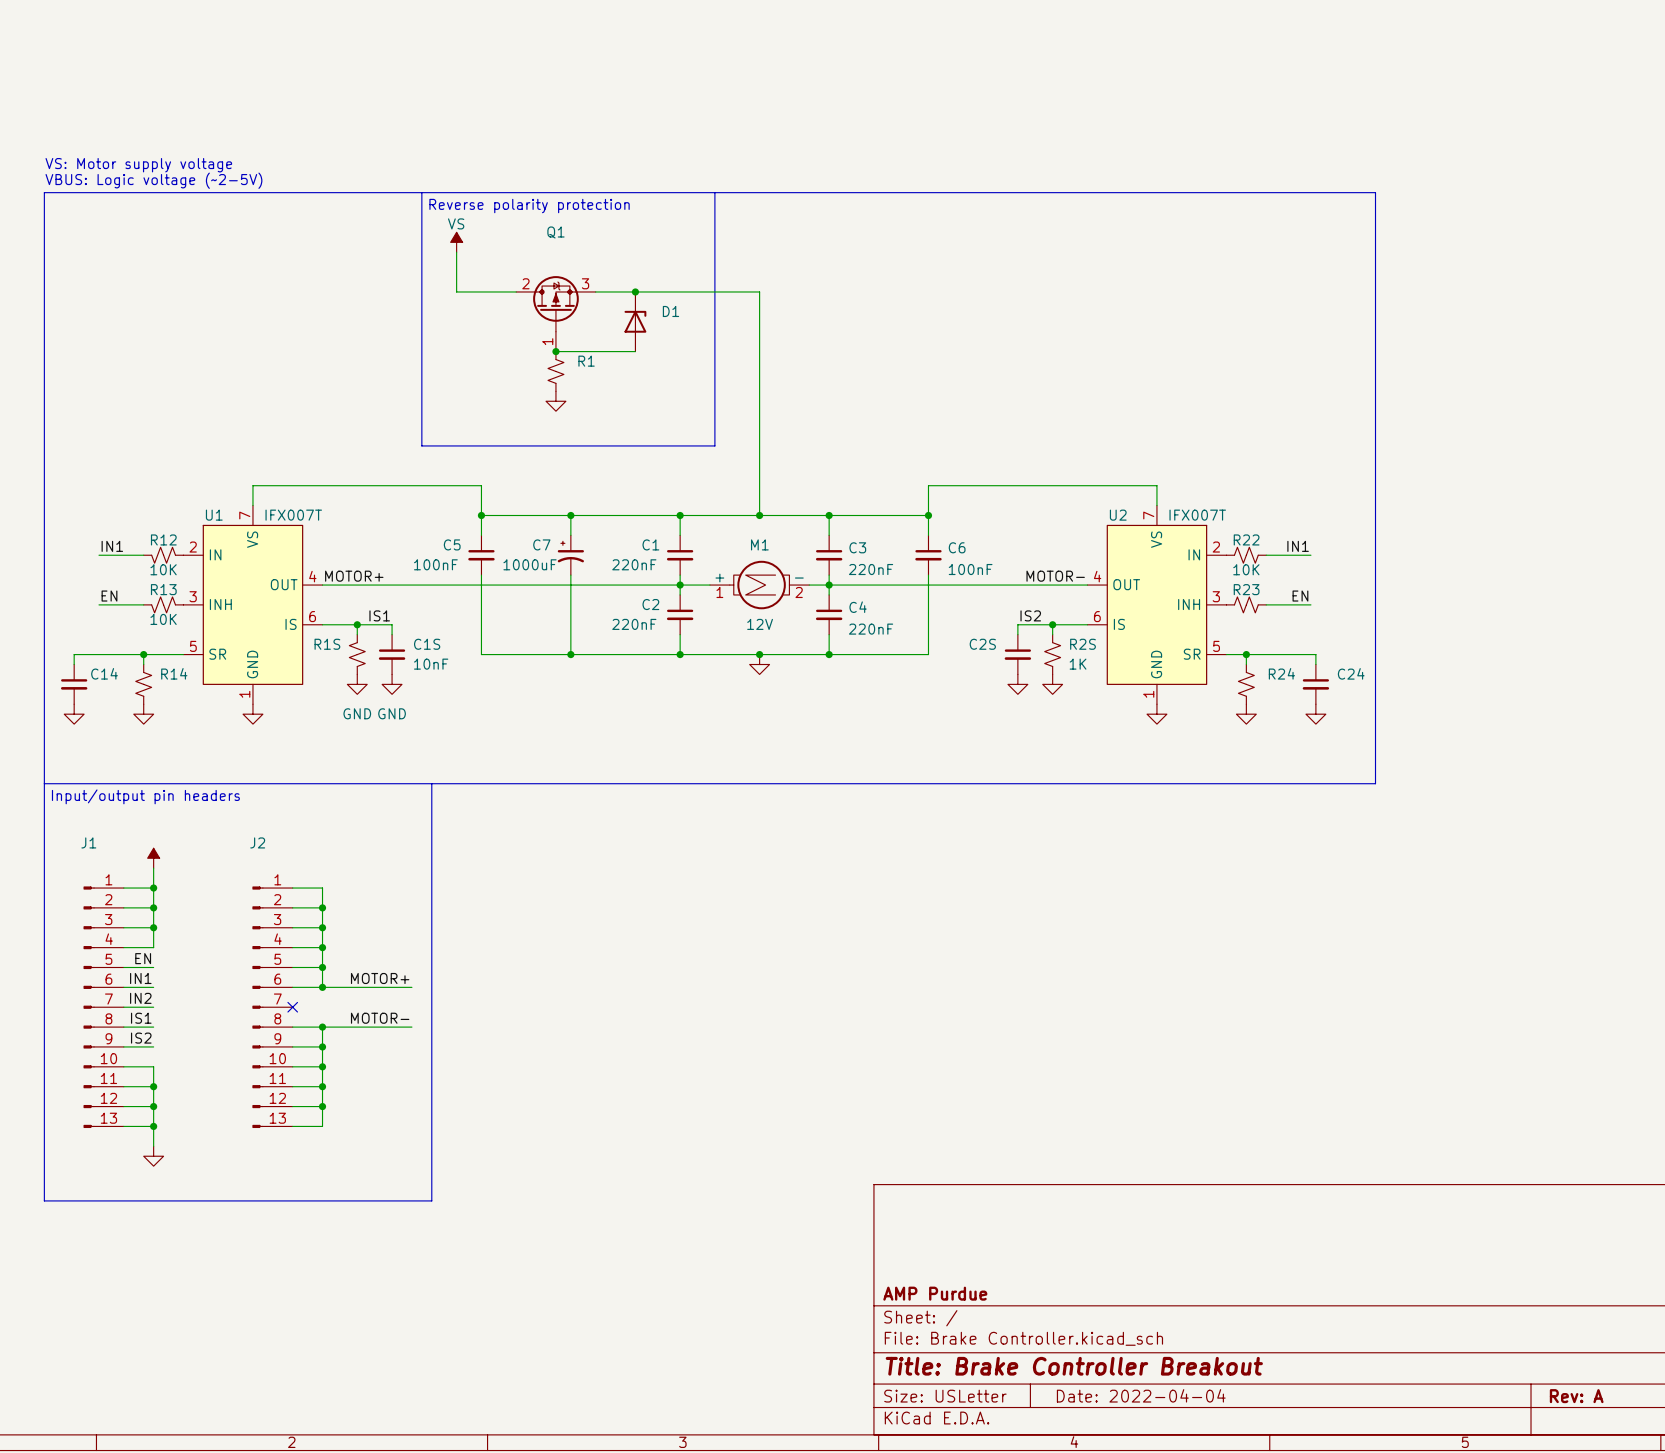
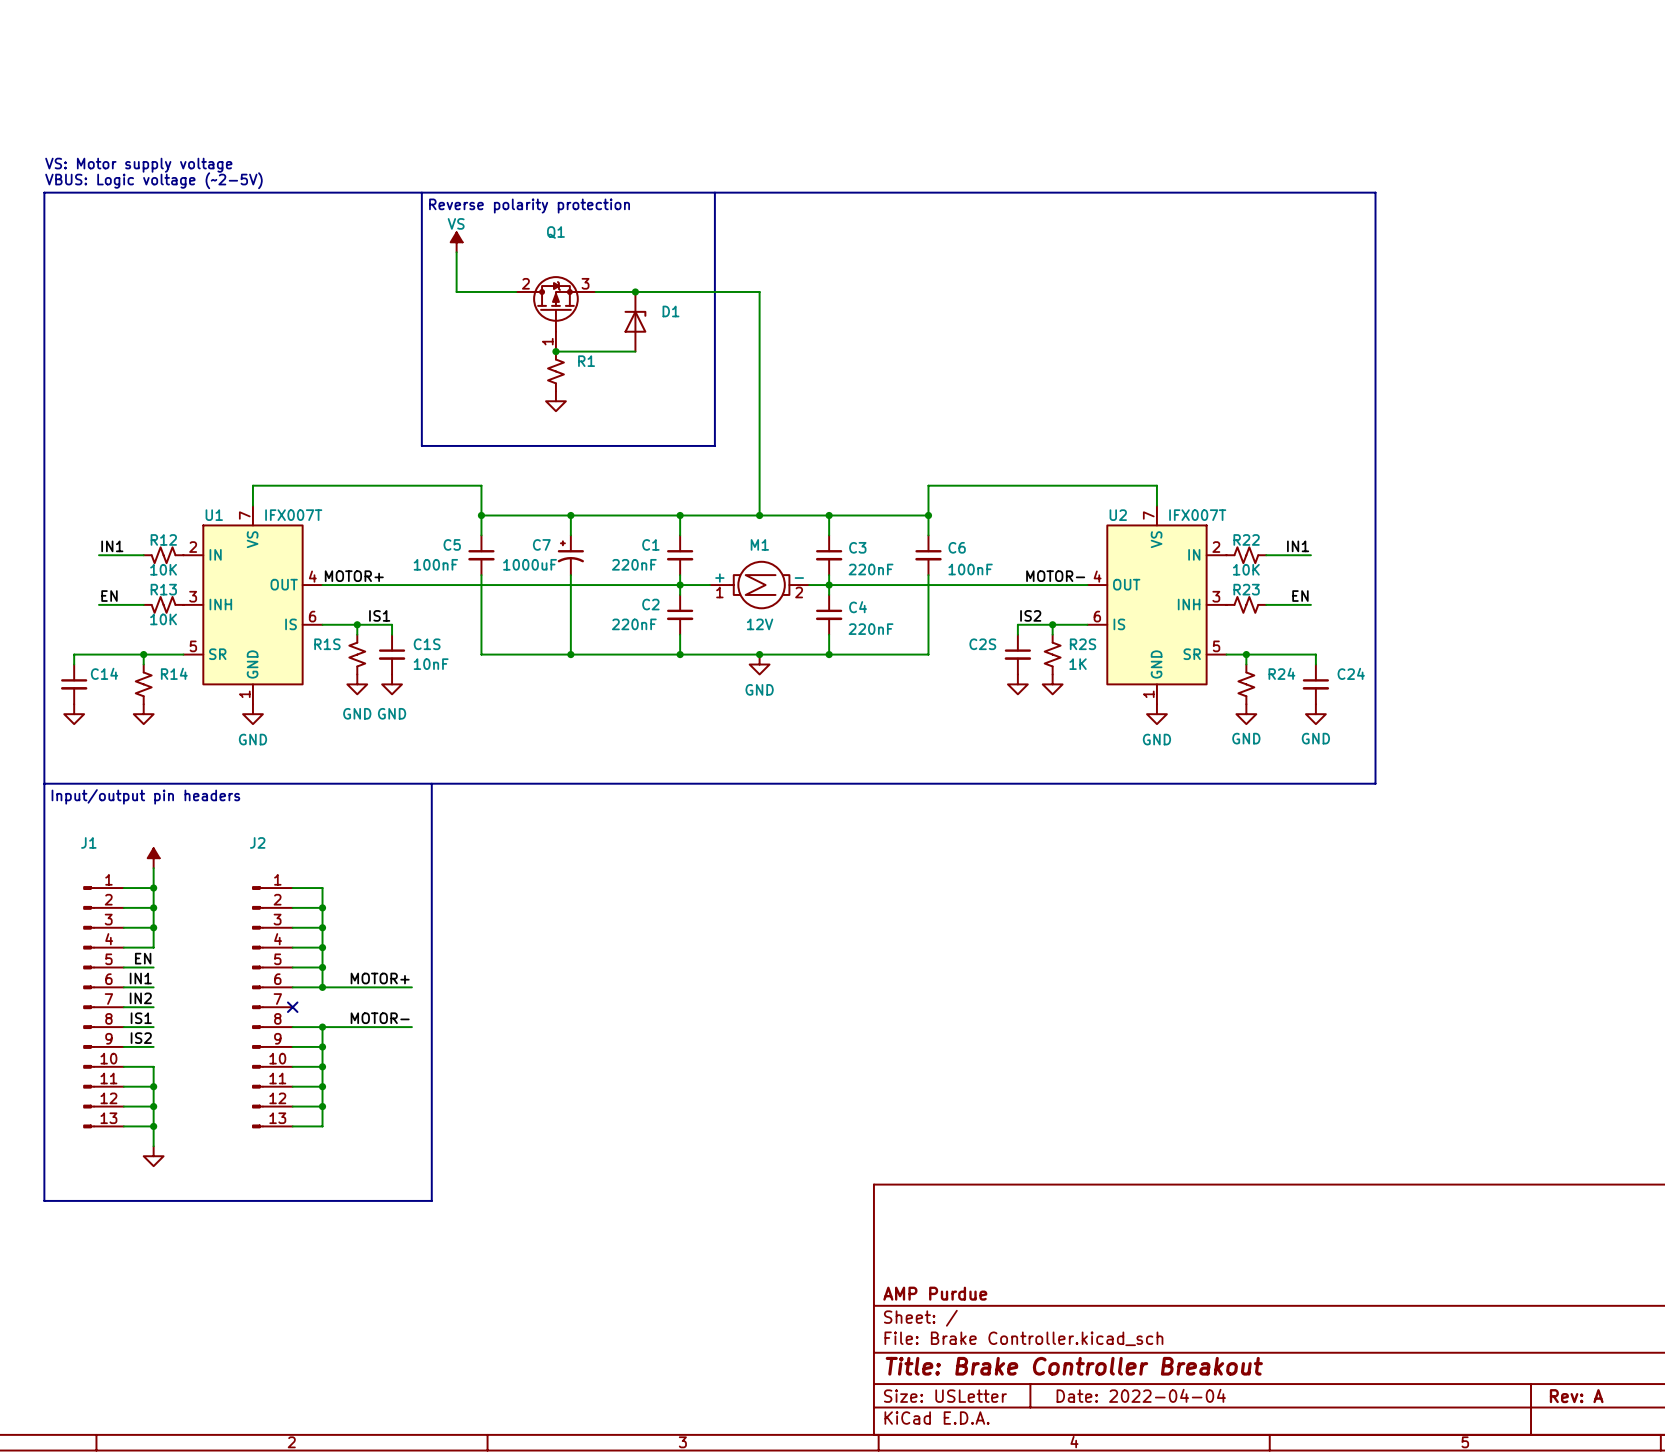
power symbol text: none -> GND (759, 689)
power symbol text: none -> GND (1246, 738)
power symbol text: none -> GND (1315, 738)
power symbol text: none -> GND (252, 739)
power symbol text: none -> GND (1156, 739)

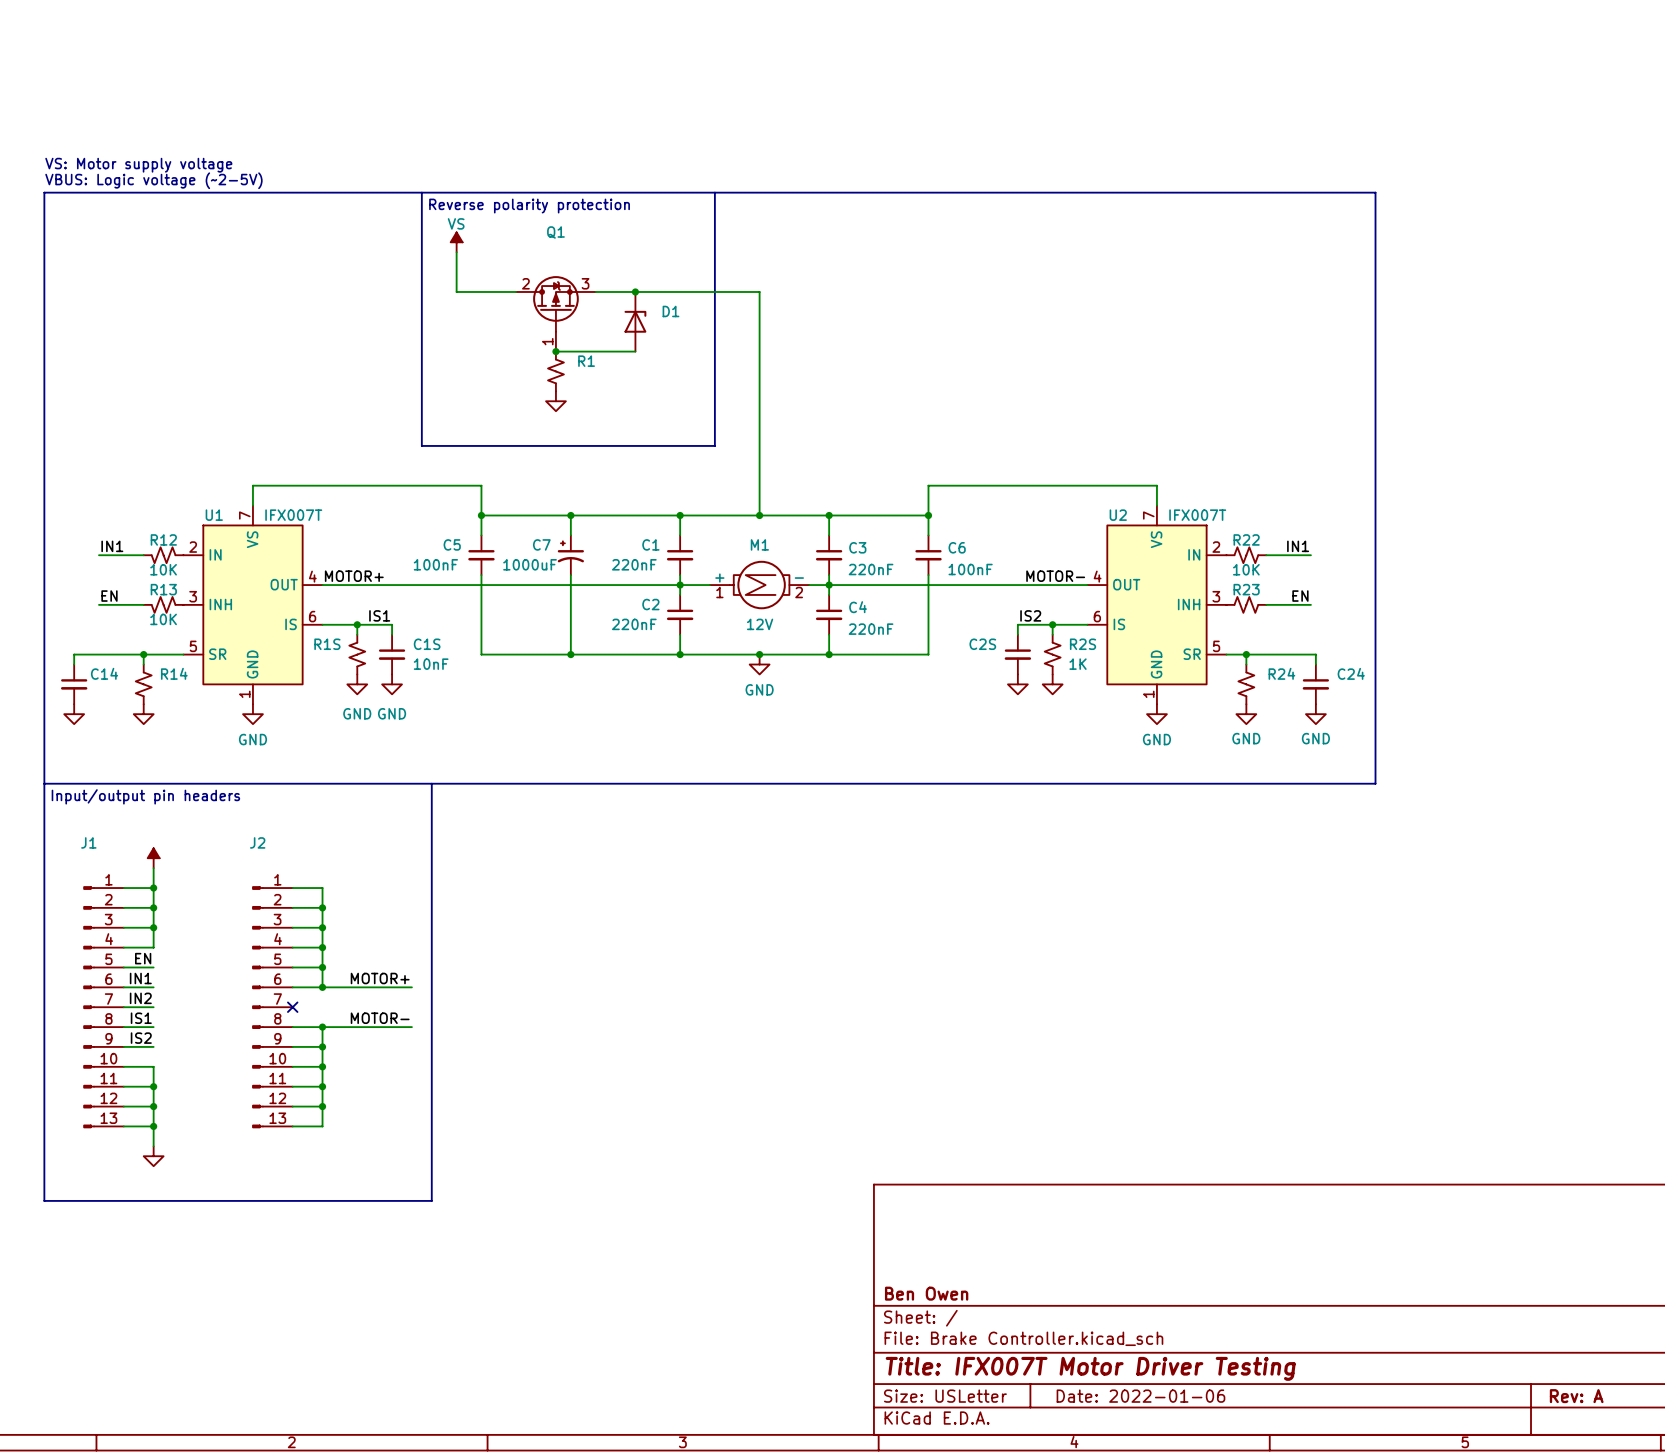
title block: AMP Purdue (935, 1293) -> Ben Owen (926, 1293)
title block: Title: Brake Controller Breakout (1074, 1366) -> Title: IFX007T Motor Driver Testing (1090, 1368)
title block: Date: 2022-04-04 (1141, 1395) -> Date: 2022-01-06 (1140, 1396)

